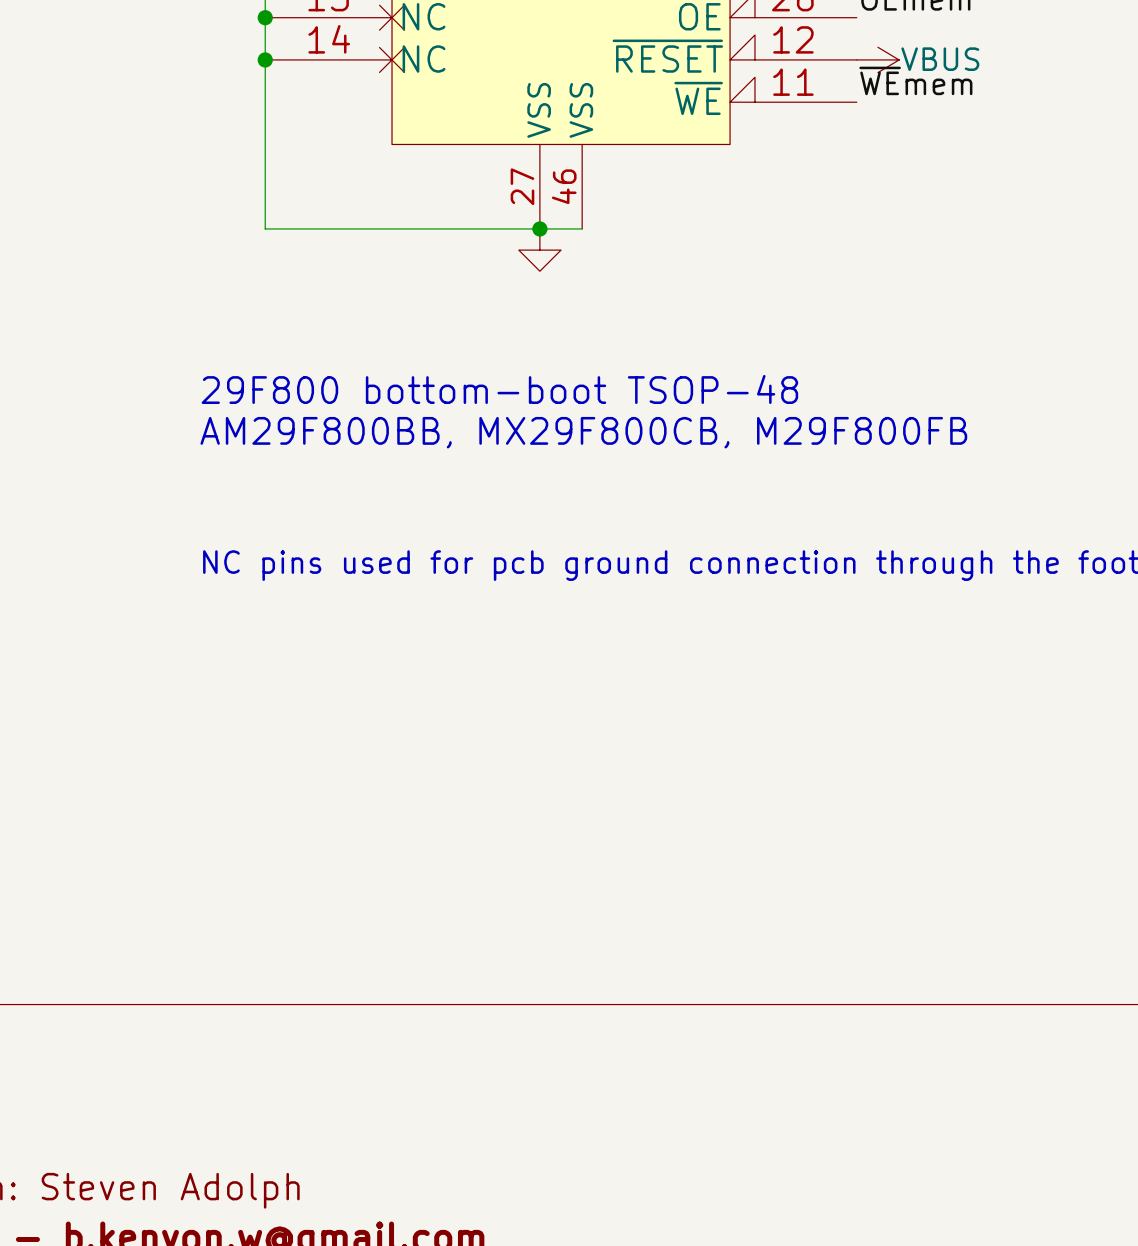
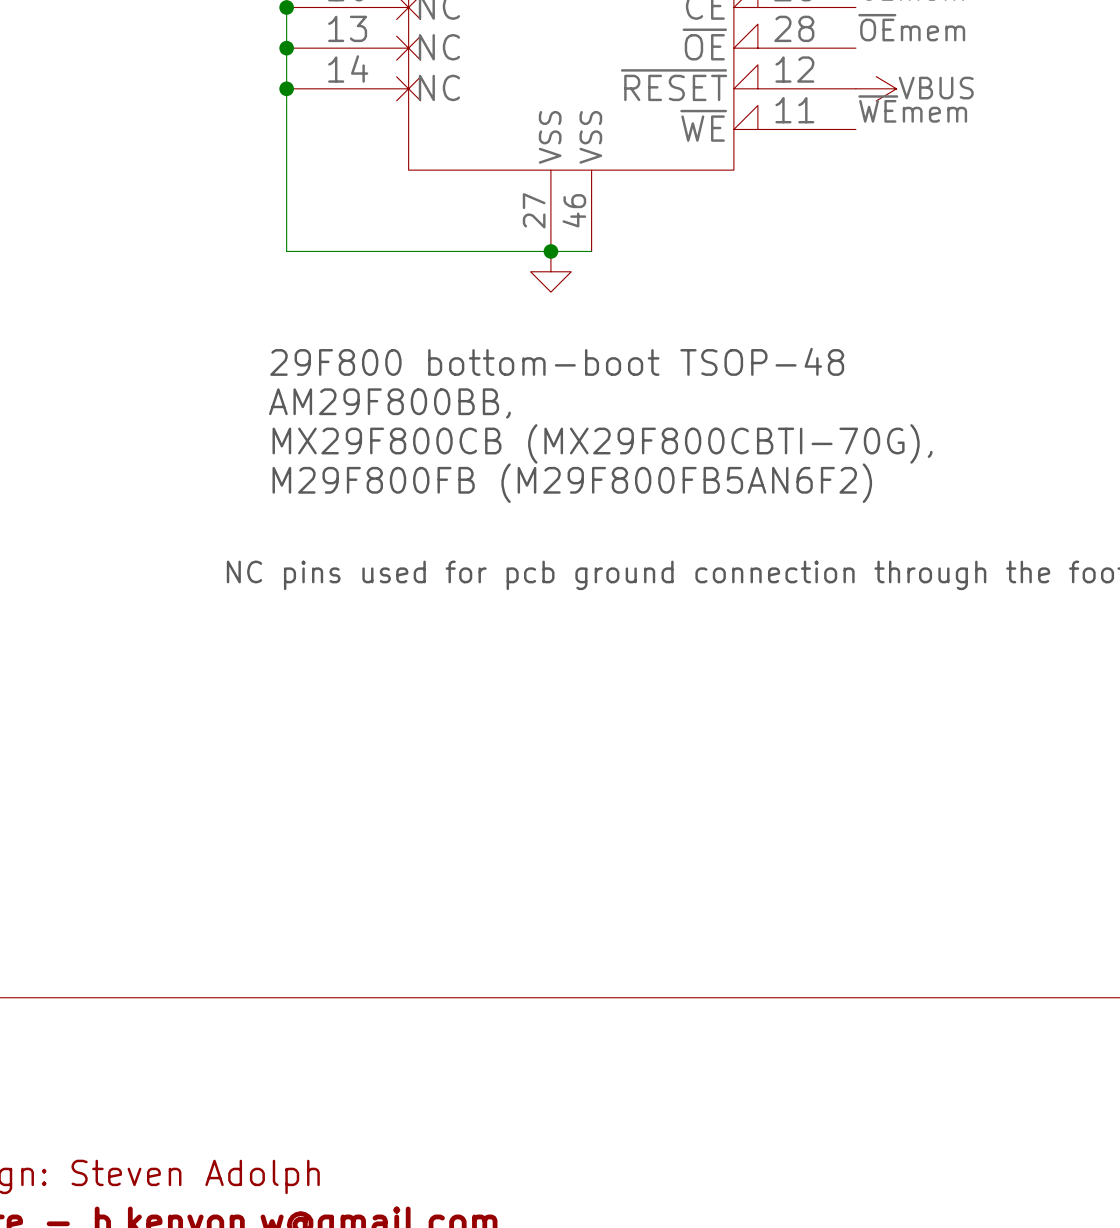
text: none -> AM29F800BB, (389, 403)
text position: 29F800 bottom-boot TSOP-48 (499, 389) -> 29F800 bottom-boot TSOP-48 (557, 361)
text: AM29F800BB, MX29F800CB, M29F800FB (583, 432) -> MX29F800CB (MX29F800CBTI-70G), (602, 443)
text: none -> M29F800FB (M29F800FB5AN6F2) (572, 483)

